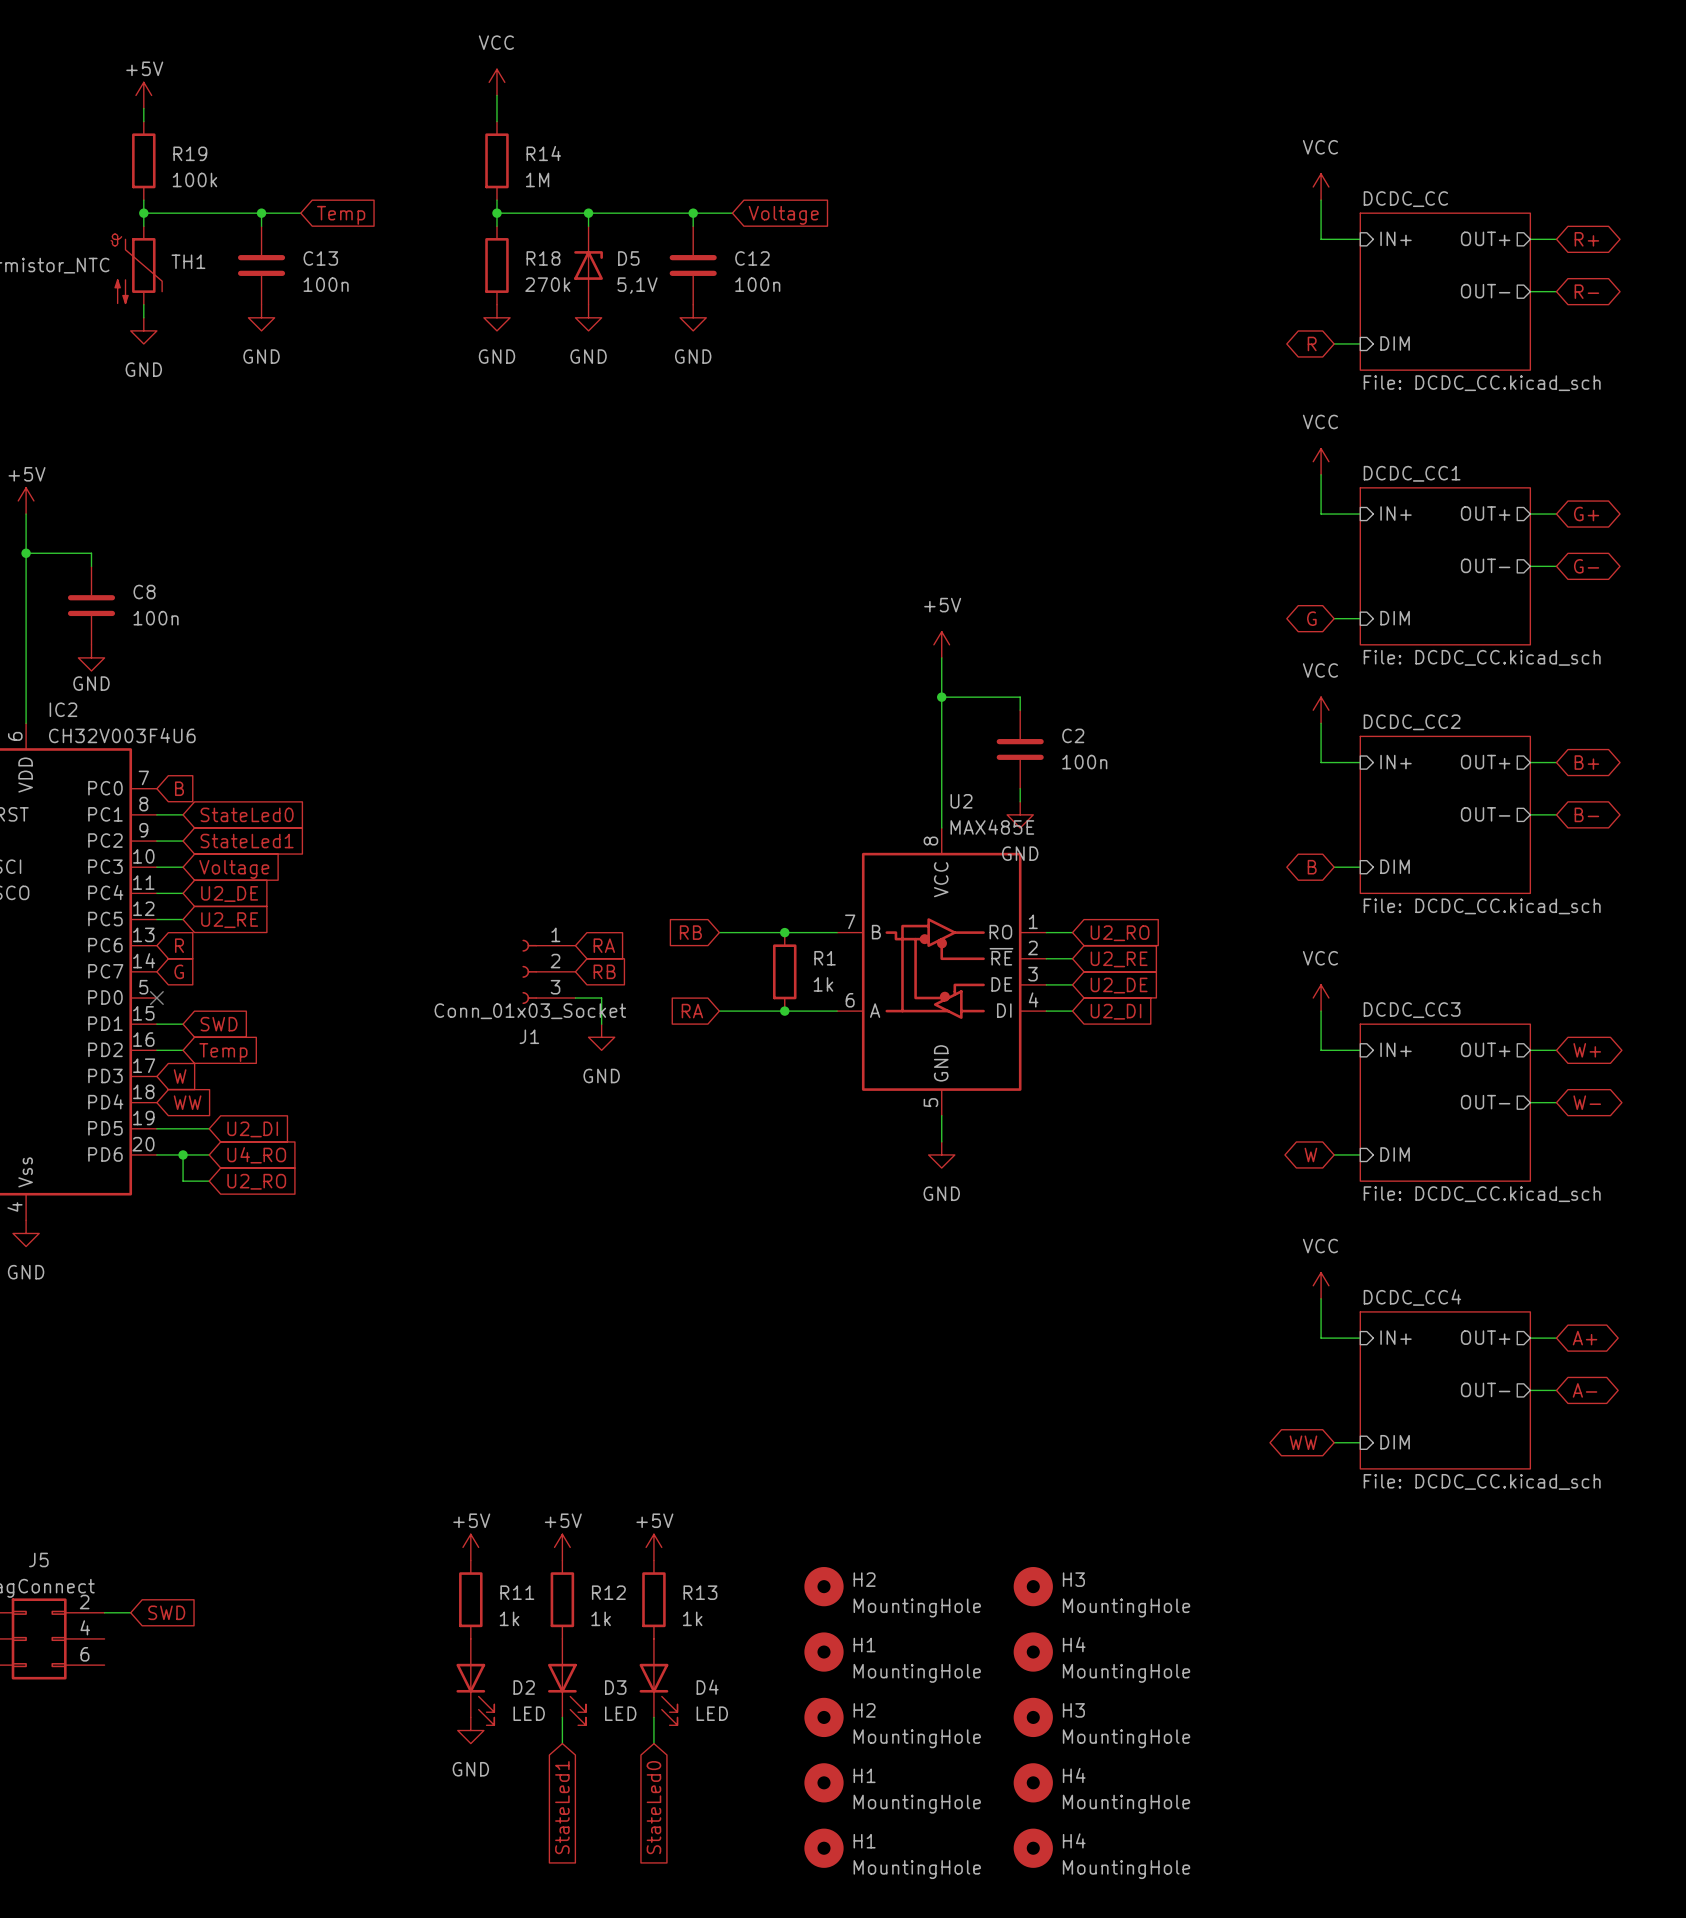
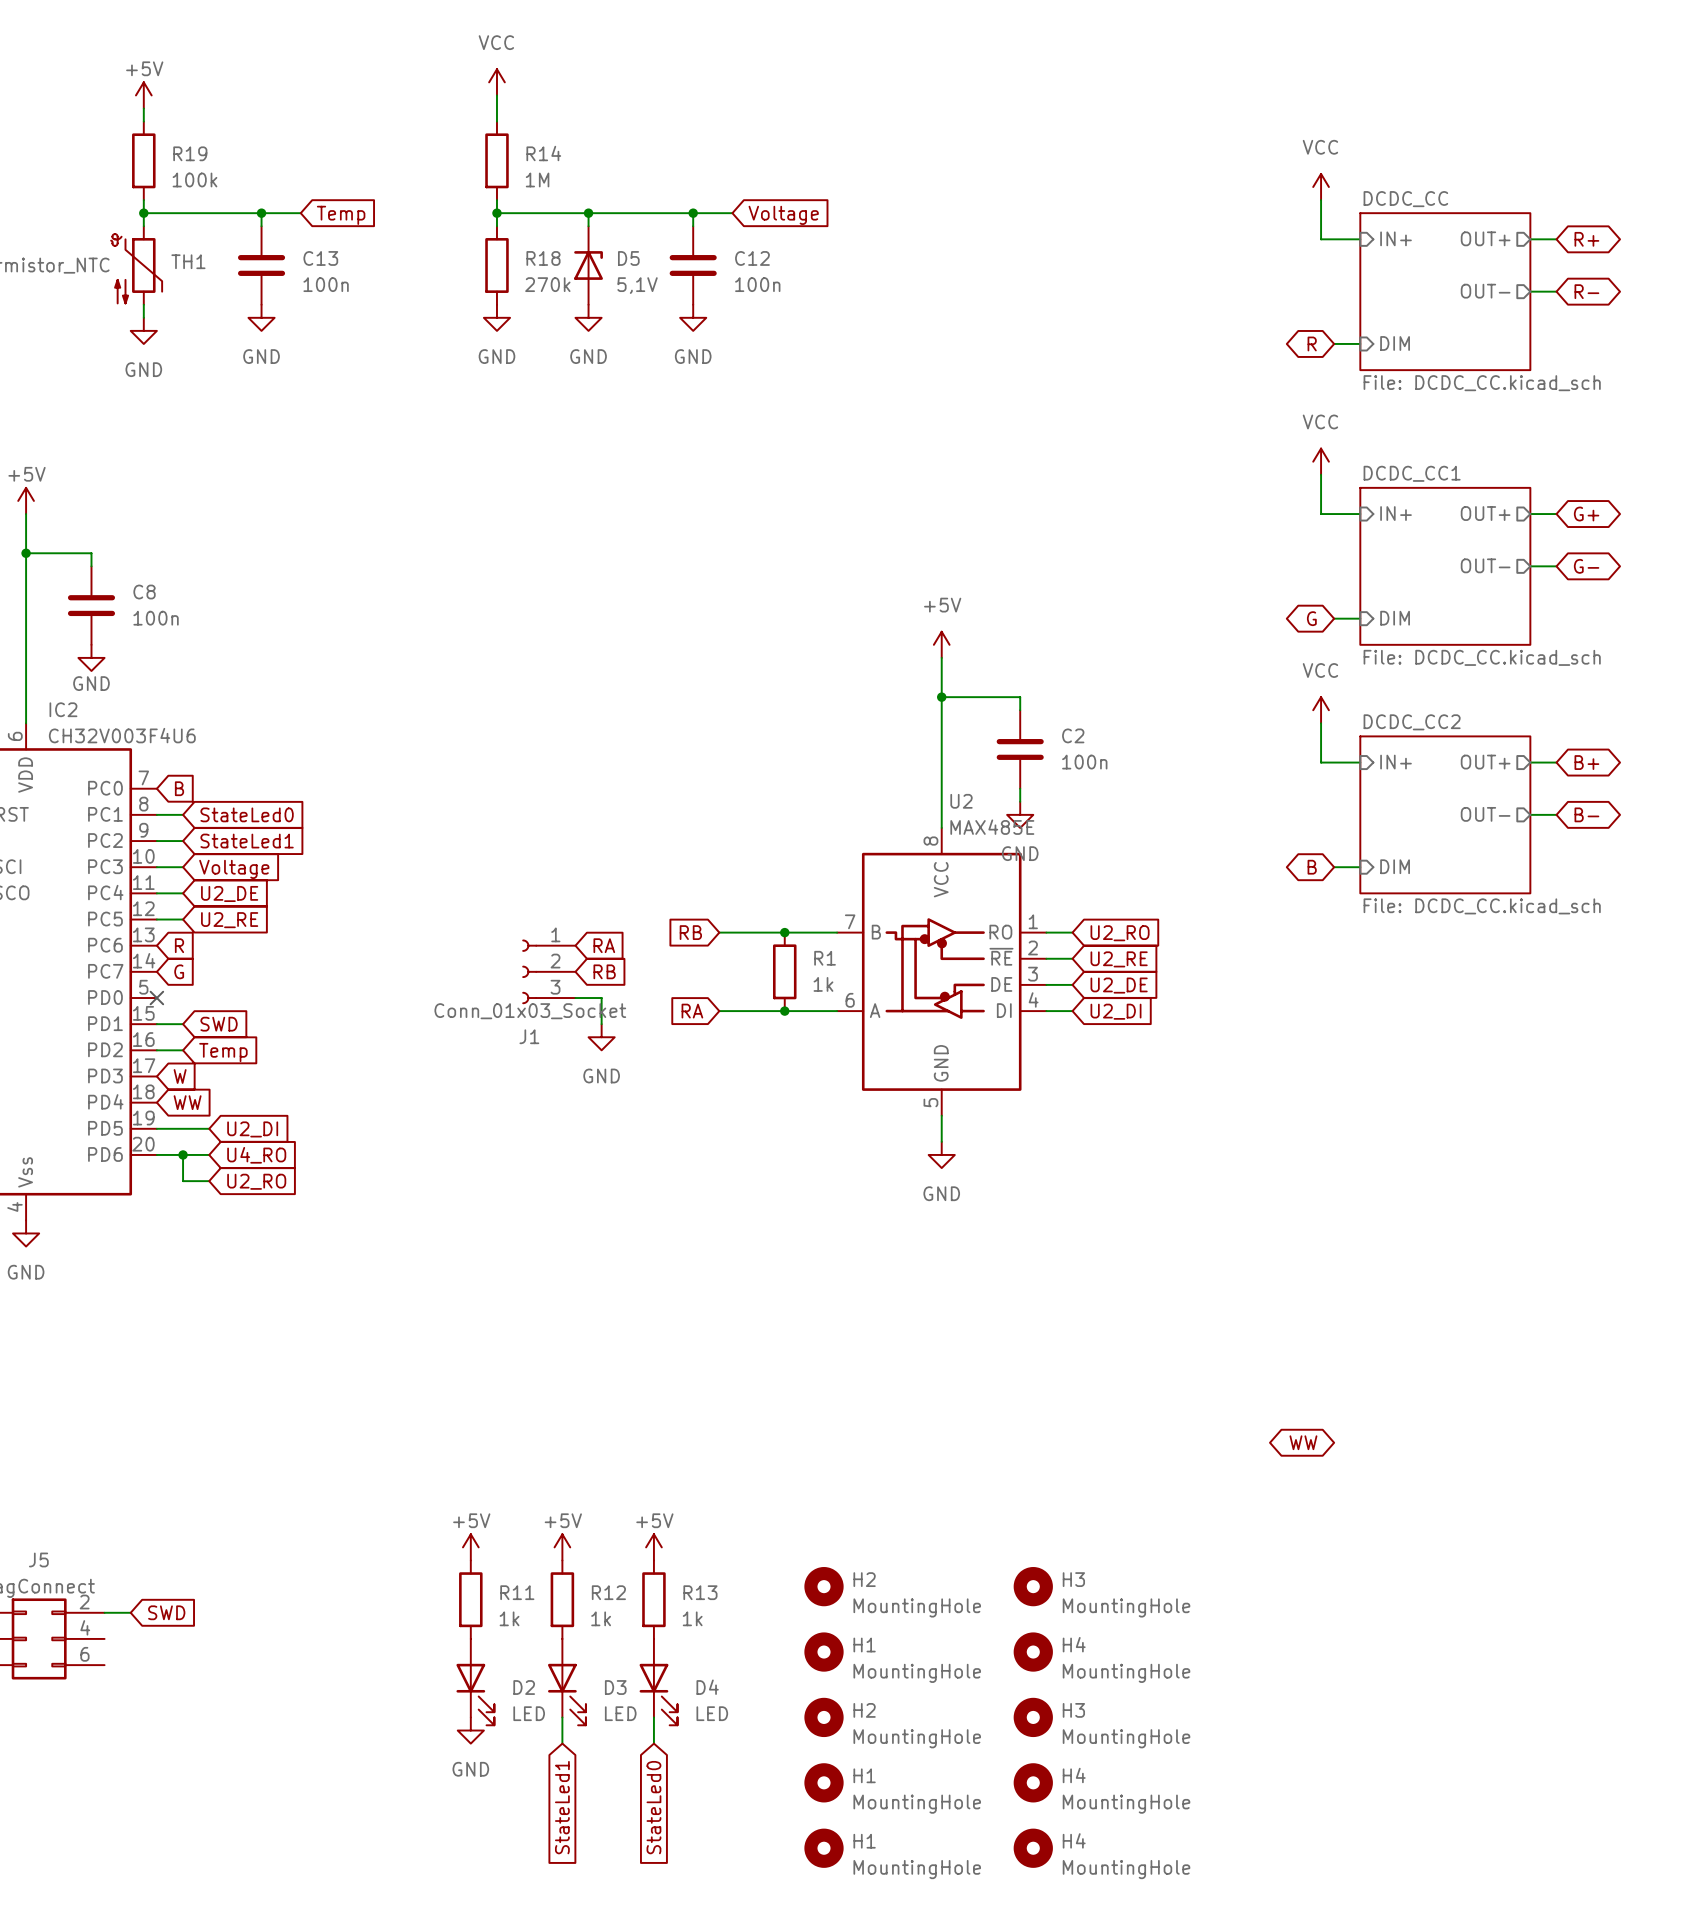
power symbol: VCC (1321, 998) -> none
wire: (1321, 1011) (1321, 1050) (1360, 1050) -> none
sheet pin: IN+ (1396, 1049) -> none
sheet pin: OUT+ (1485, 1049) -> none
wire: (1530, 1050) (1556, 1050) -> none
global label: W+ (1587, 1050) -> none
sheet DCDC_CC3: File: DCDC_CC.kicad_sch (1445, 1102) -> none
sheet pin: OUT- (1485, 1102) -> none
wire: (1530, 1102) (1556, 1102) -> none
global label: W- (1587, 1102) -> none
global label: W (1310, 1154) -> none
wire: (1334, 1154) (1360, 1154) -> none
sheet pin: DIM (1395, 1154) -> none
power symbol: VCC (1321, 1285) -> none
wire: (1321, 1298) (1321, 1338) (1360, 1338) -> none
sheet pin: IN+ (1396, 1337) -> none
sheet pin: OUT+ (1485, 1337) -> none
wire: (1530, 1338) (1556, 1338) -> none
global label: A+ (1585, 1338) -> none
sheet pin: OUT- (1485, 1389) -> none
sheet DCDC_CC4: File: DCDC_CC.kicad_sch (1445, 1390) -> none
wire: (1530, 1390) (1556, 1390) -> none
global label: A- (1585, 1390) -> none
wire: (1334, 1442) (1360, 1442) -> none
sheet pin: DIM (1395, 1442) -> none

